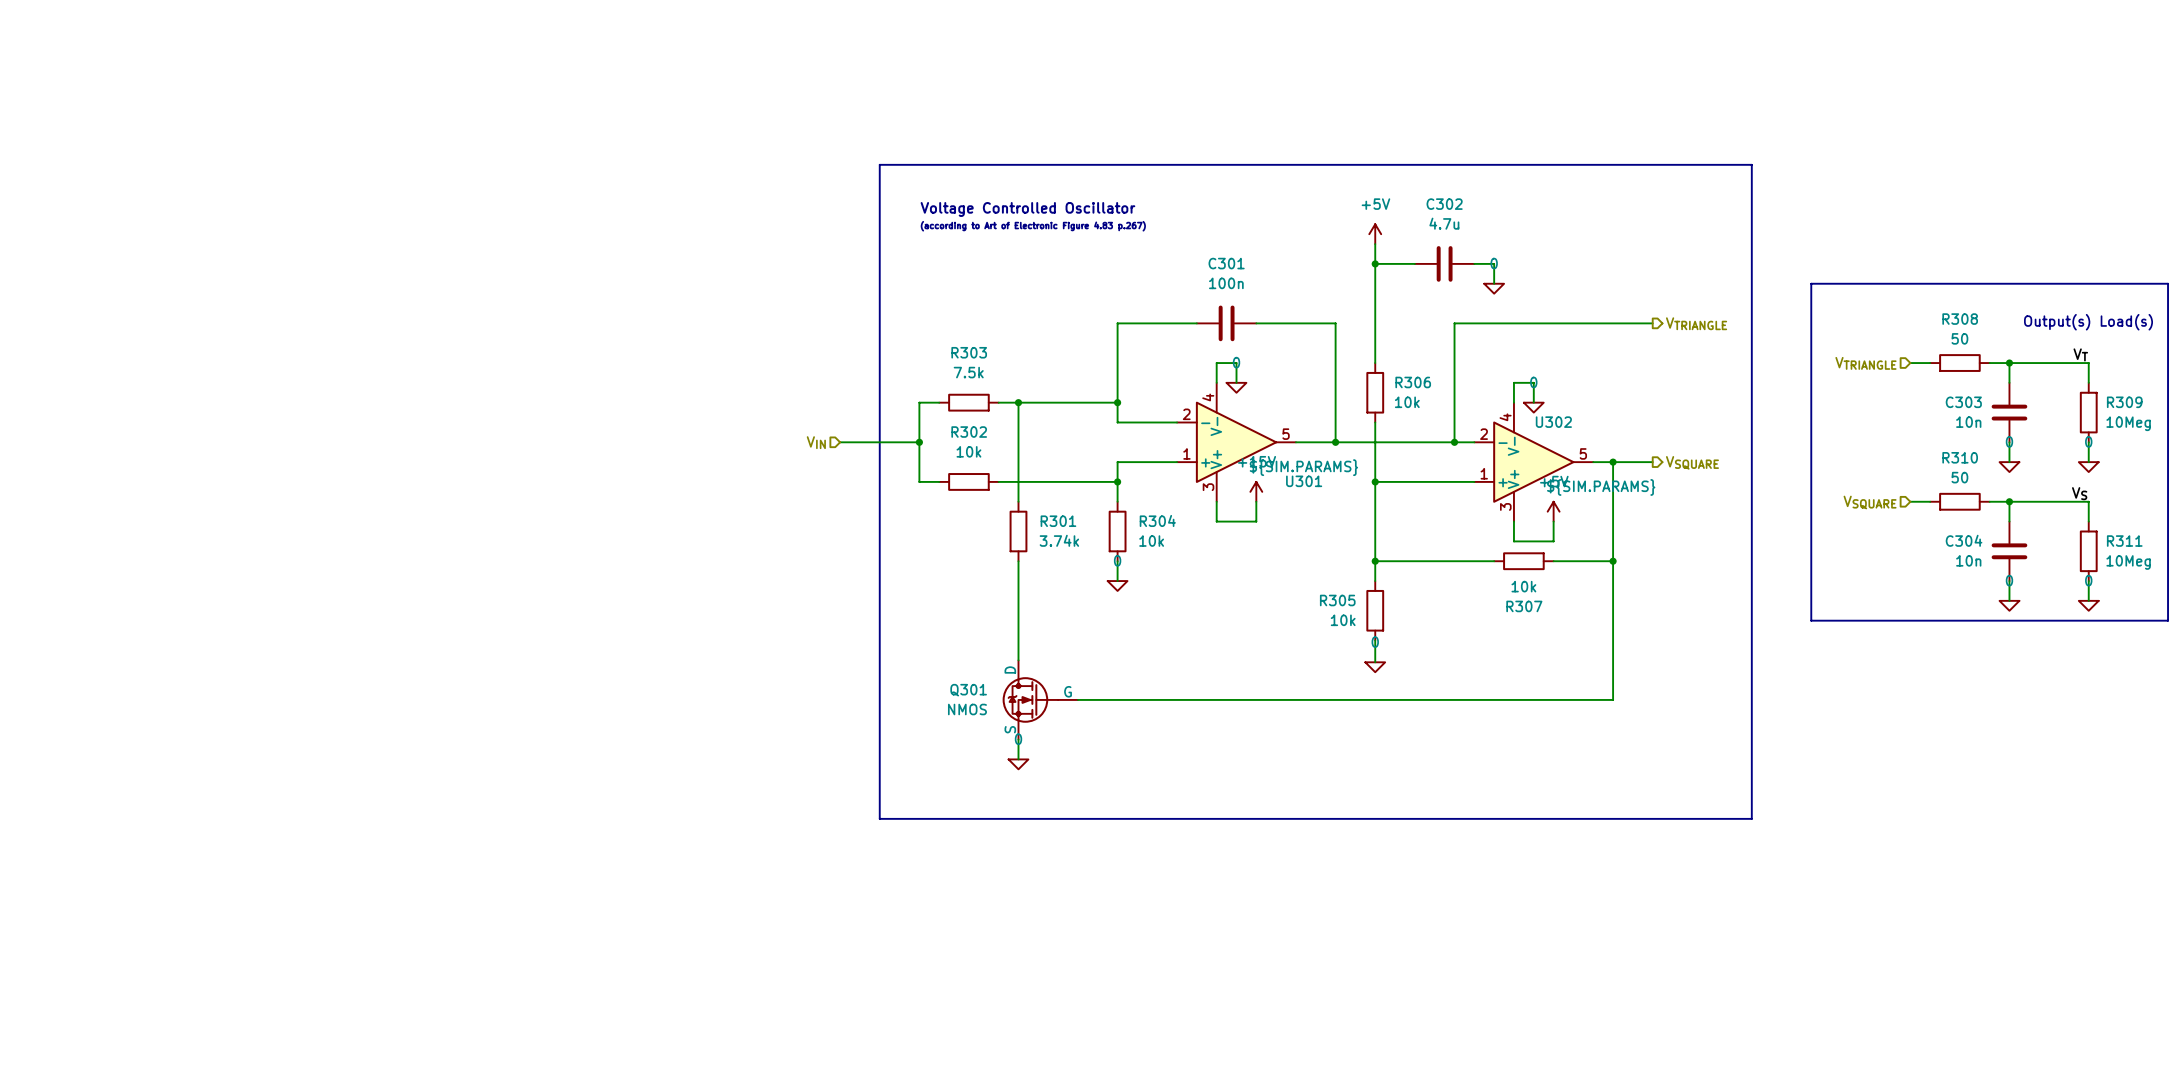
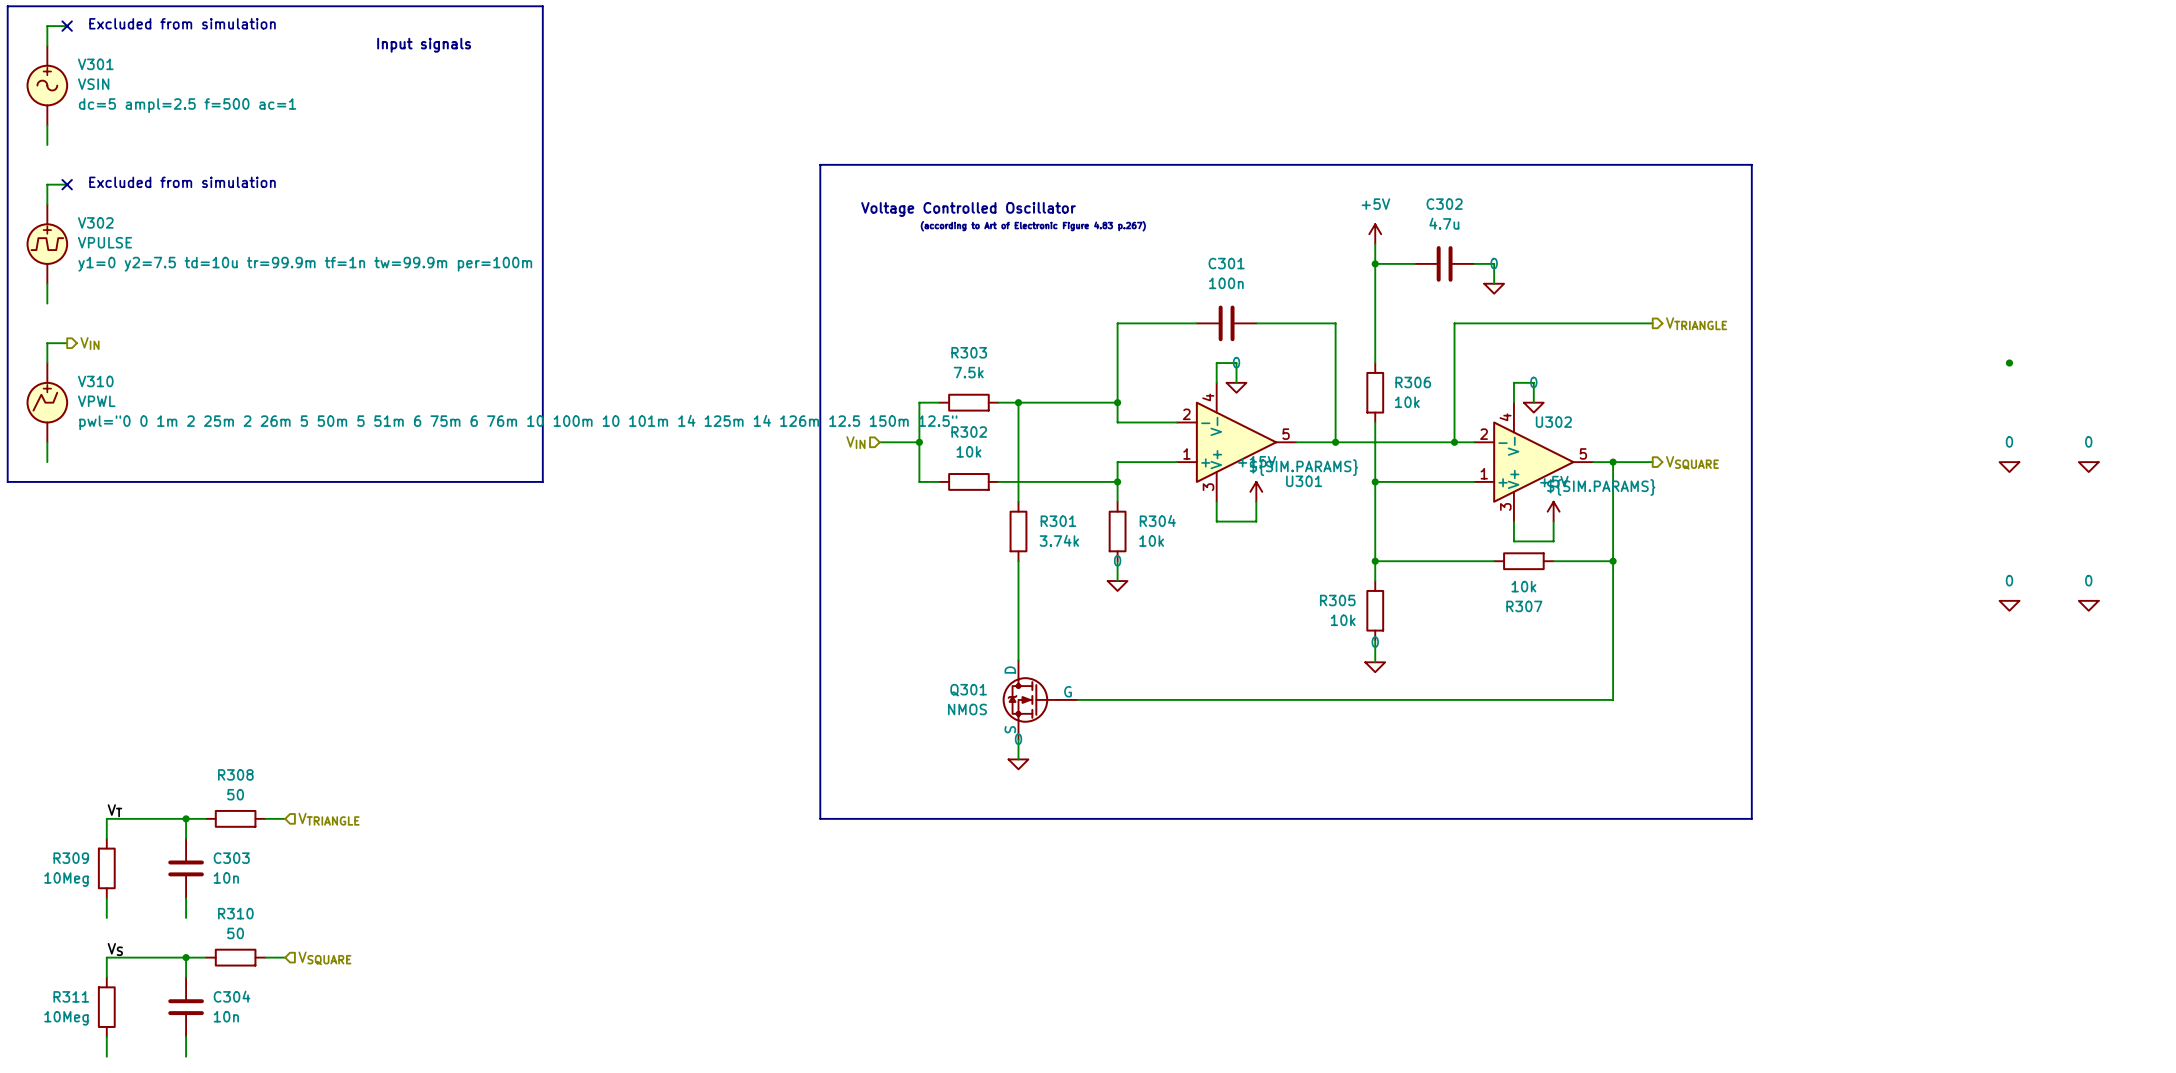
line: none -> (7, 6) (542, 6) (542, 481) (7, 481) (7, 6)
text: none -> Excluded from simulation (182, 23)
wire: none -> (67, 26) (47, 26) (47, 45)
no-connect mark: none -> (67, 26)
text: none -> Input signals (424, 45)
V301: none -> VSIN (47, 85)
wire: none -> (47, 125) (47, 145)
line: (879, 164) (879, 818) -> (879, 164) (820, 164) (820, 818) (879, 818)
text: none -> Excluded from simulation (182, 182)
wire: none -> (67, 184) (47, 184) (47, 204)
no-connect mark: none -> (67, 184)
text position: Voltage Controlled Oscillator (1027, 209) -> Voltage Controlled Oscillator (968, 209)
V302: none -> VPULSE (47, 244)
wire: none -> (47, 283) (47, 303)
line: (1811, 283) (2168, 283) (2168, 620) (1811, 620) (1811, 283) -> none
text: Output(s) Load(s) (2088, 322) -> none
wire: none -> (67, 343) (47, 343) (47, 363)
hierarchical label: none -> VIN (90, 343)
label: VT (2080, 354) -> none
hierarchical label: VTRIANGLE (1865, 363) -> none
wire: (1910, 363) (1930, 363) -> none
R308 position: (1959, 363) -> (235, 818)
wire: (1989, 363) (2088, 363) (2088, 382) -> none
wire: (2009, 363) (2009, 382) -> none
V310: none -> VPWL (47, 402)
C303 name position: C303 (1963, 402) -> C303 (231, 858)
R309 name position: R309 (2124, 402) -> R309 (71, 858)
C303 position: (2009, 412) -> (186, 868)
R309 position: (2088, 412) -> (106, 868)
C303 value position: 10n (1968, 422) -> 10n (226, 877)
R309 value position: 10Meg (2128, 423) -> 10Meg (66, 879)
wire: none -> (47, 442) (47, 462)
hierarchical label position: VIN (816, 442) -> VIN (855, 442)
wire: (840, 442) (879, 442) -> none
wire: (2009, 442) (2009, 462) -> none
wire: (2088, 442) (2088, 462) -> none
label: VS (2079, 493) -> none
wire: (1910, 501) (1930, 501) -> none
R310 position: (1959, 501) -> (235, 957)
wire: (1989, 501) (2088, 501) (2088, 521) -> none
wire: (2009, 501) (2009, 521) -> none
junction: (2009, 501) -> none
hierarchical label: VSQUARE (1870, 502) -> none
C304 name position: C304 (1964, 540) -> C304 (231, 996)
R311 name position: R311 (2124, 541) -> R311 (71, 996)
C304 position: (2009, 551) -> (186, 1007)
R311 position: (2088, 551) -> (106, 1007)
C304 value position: 10n (1968, 560) -> 10n (226, 1016)
R311 value position: 10Meg (2128, 562) -> 10Meg (66, 1018)
wire: (2009, 581) (2009, 600) -> none
wire: (2088, 581) (2088, 600) -> none
label: none -> VT (114, 810)
wire: none -> (186, 818) (186, 838)
junction: none -> (186, 818)
wire: none -> (205, 818) (106, 818) (106, 838)
wire: none -> (265, 818) (285, 818)
hierarchical label: none -> VTRIANGLE (329, 819)
wire: none -> (106, 898) (106, 917)
wire: none -> (186, 898) (186, 917)
label: none -> VS (115, 949)
wire: none -> (186, 957) (186, 977)
junction: none -> (186, 957)
wire: none -> (205, 957) (106, 957) (106, 977)
wire: none -> (265, 957) (285, 957)
hierarchical label: none -> VSQUARE (324, 958)
wire: none -> (106, 1036) (106, 1056)
wire: none -> (186, 1036) (186, 1056)

